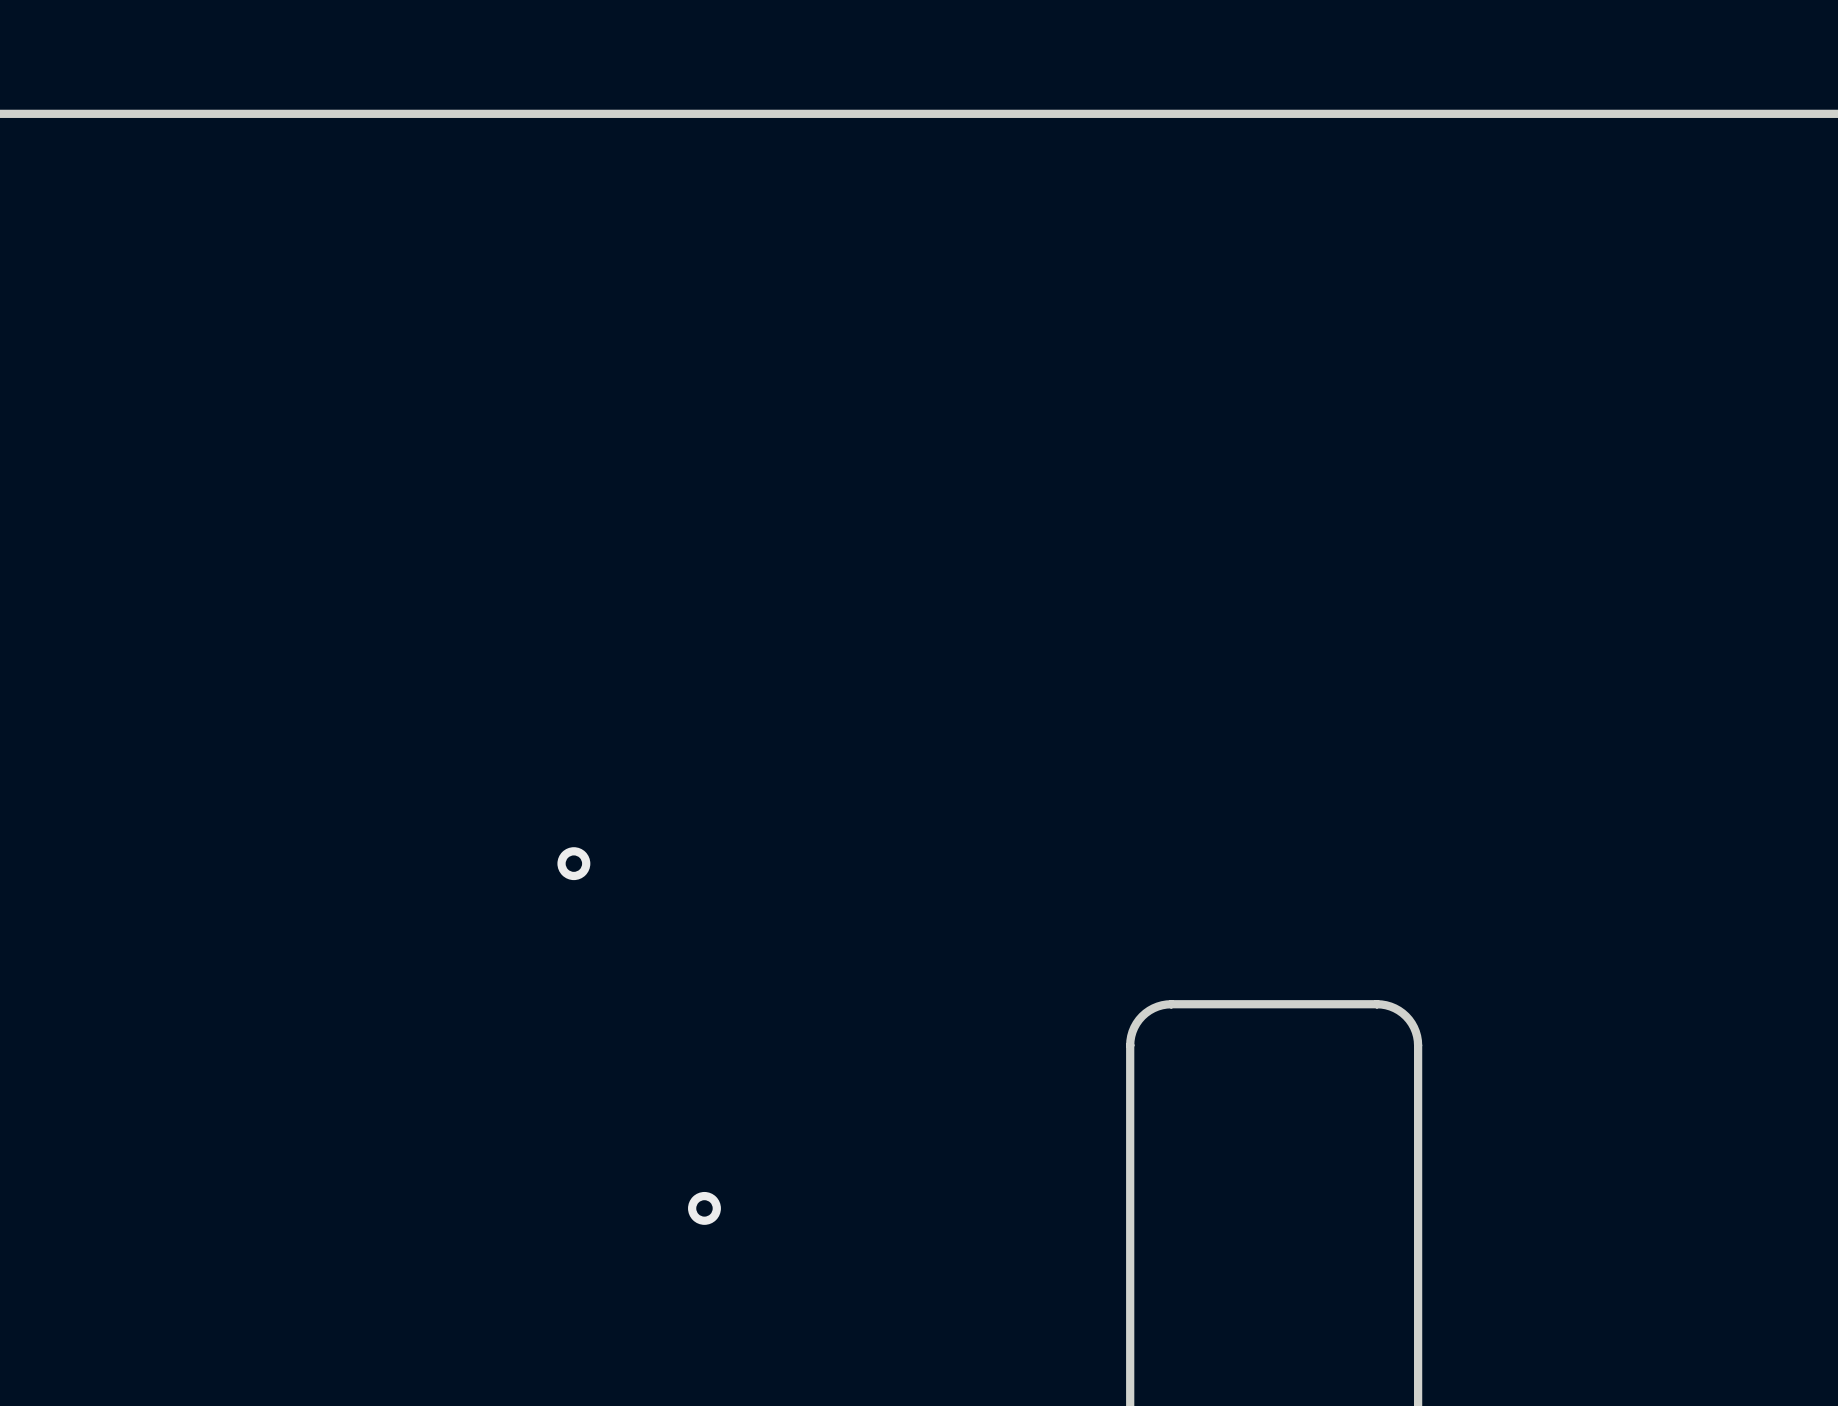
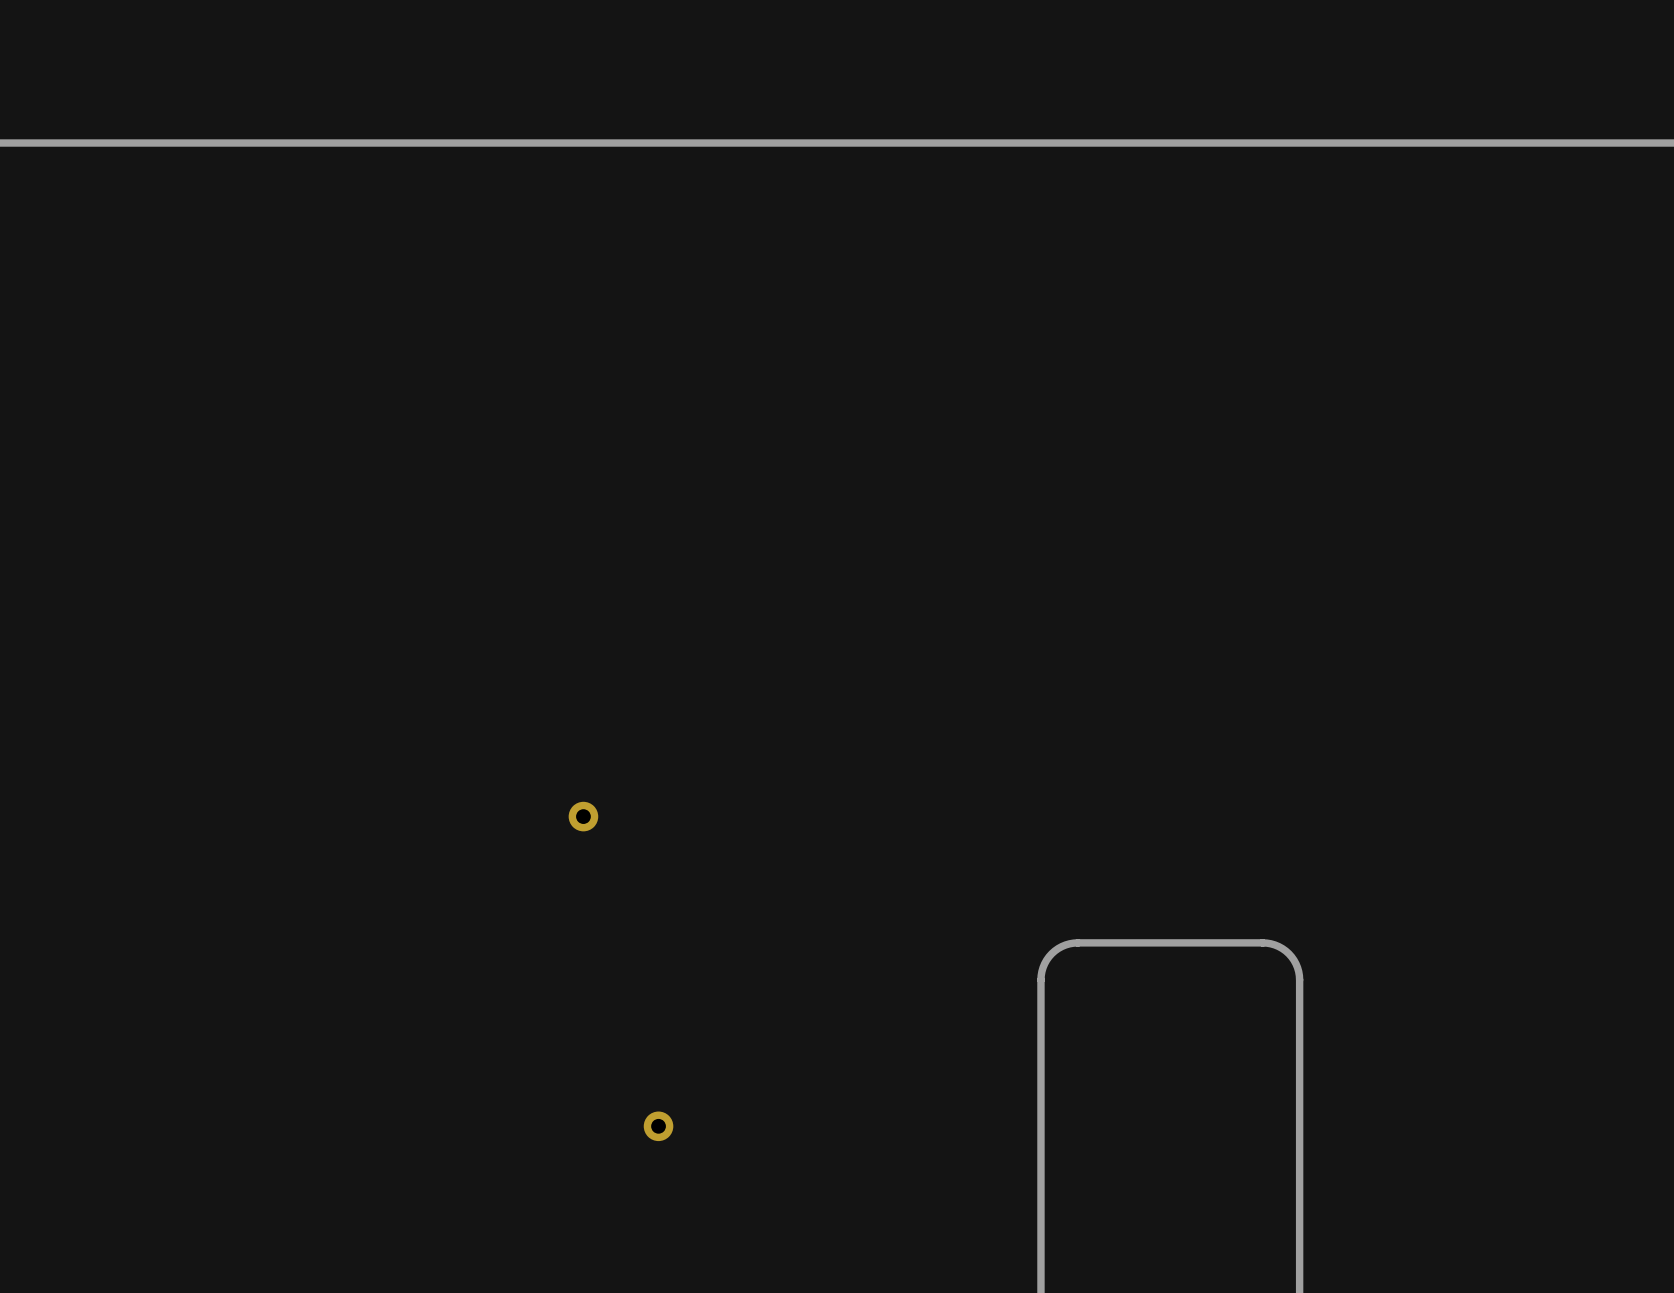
via position: (573, 863) -> (583, 816)

